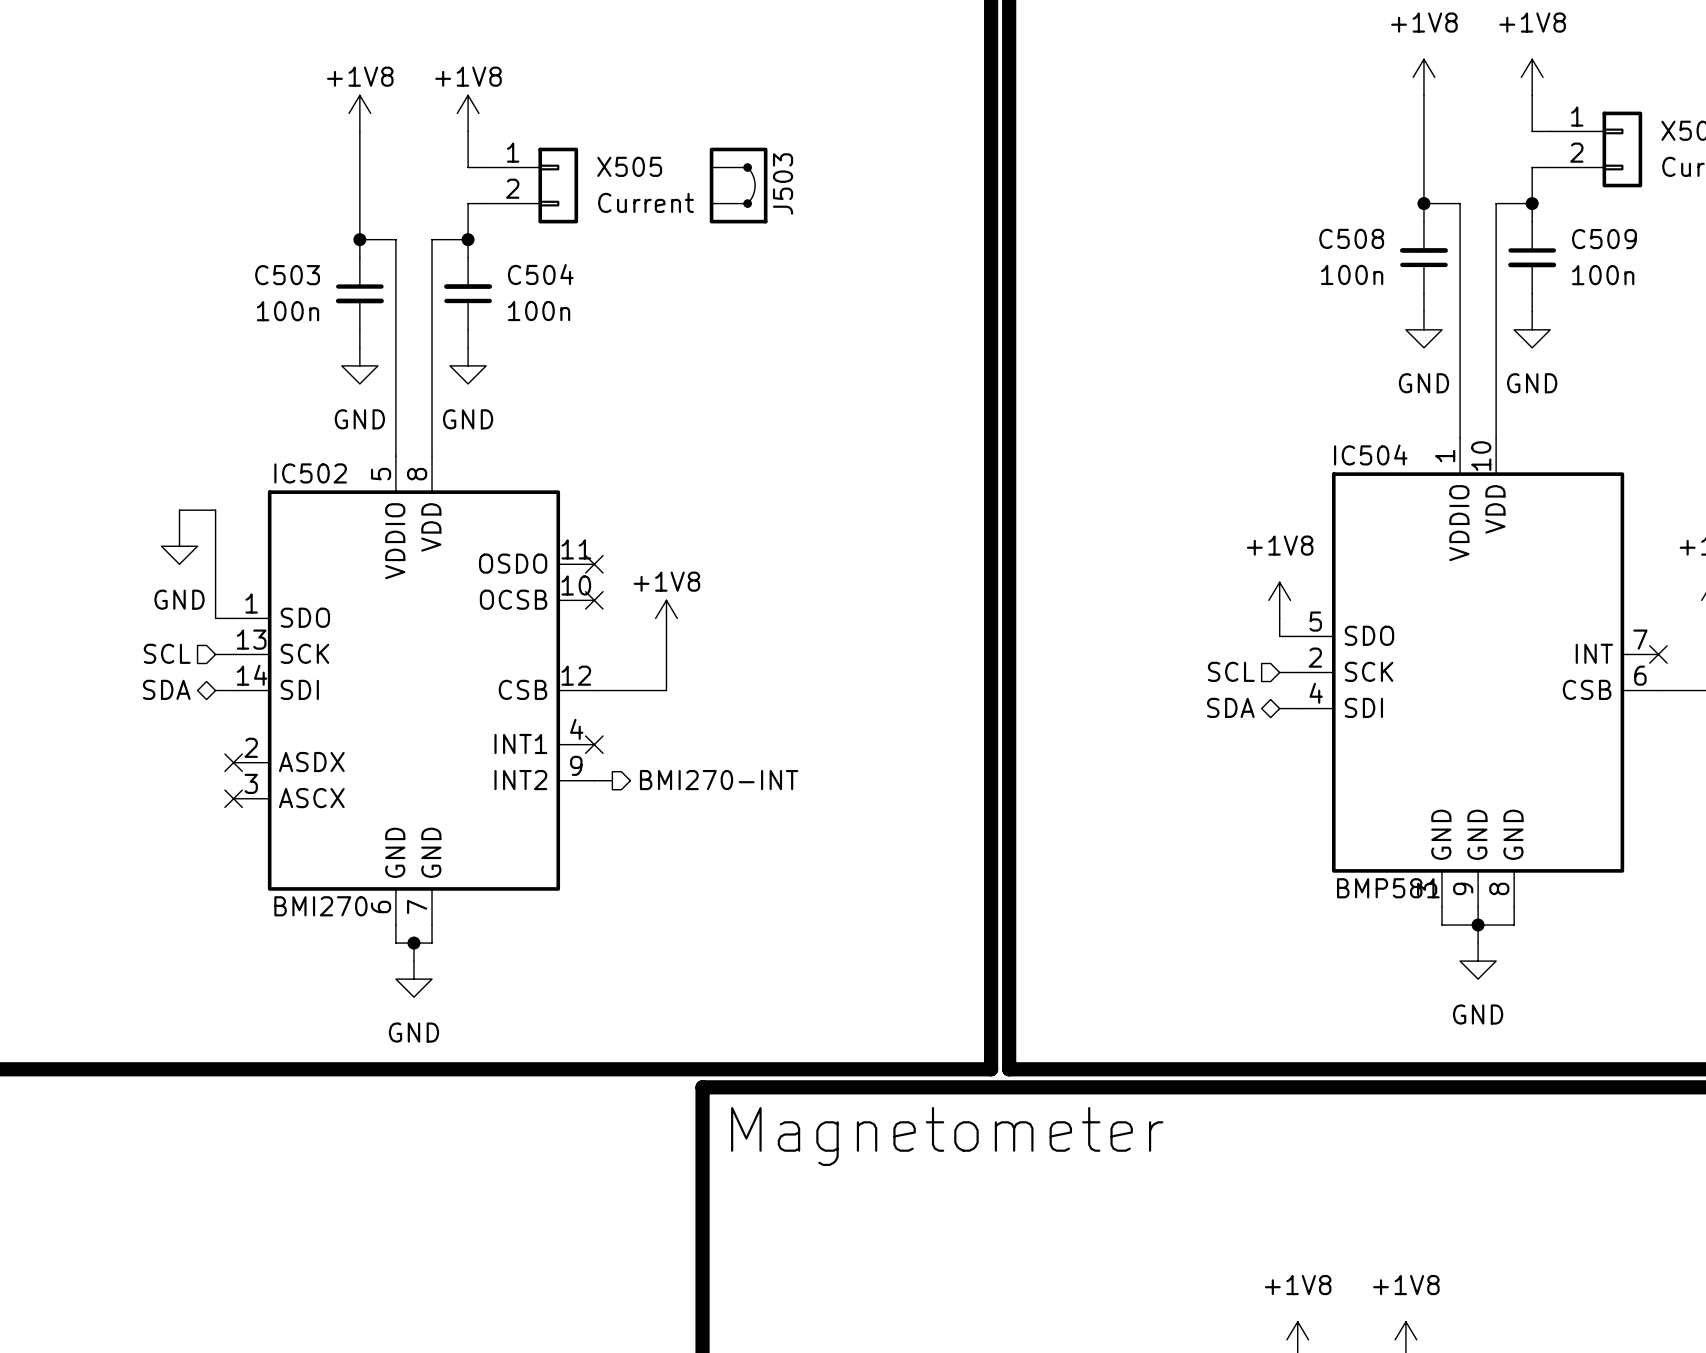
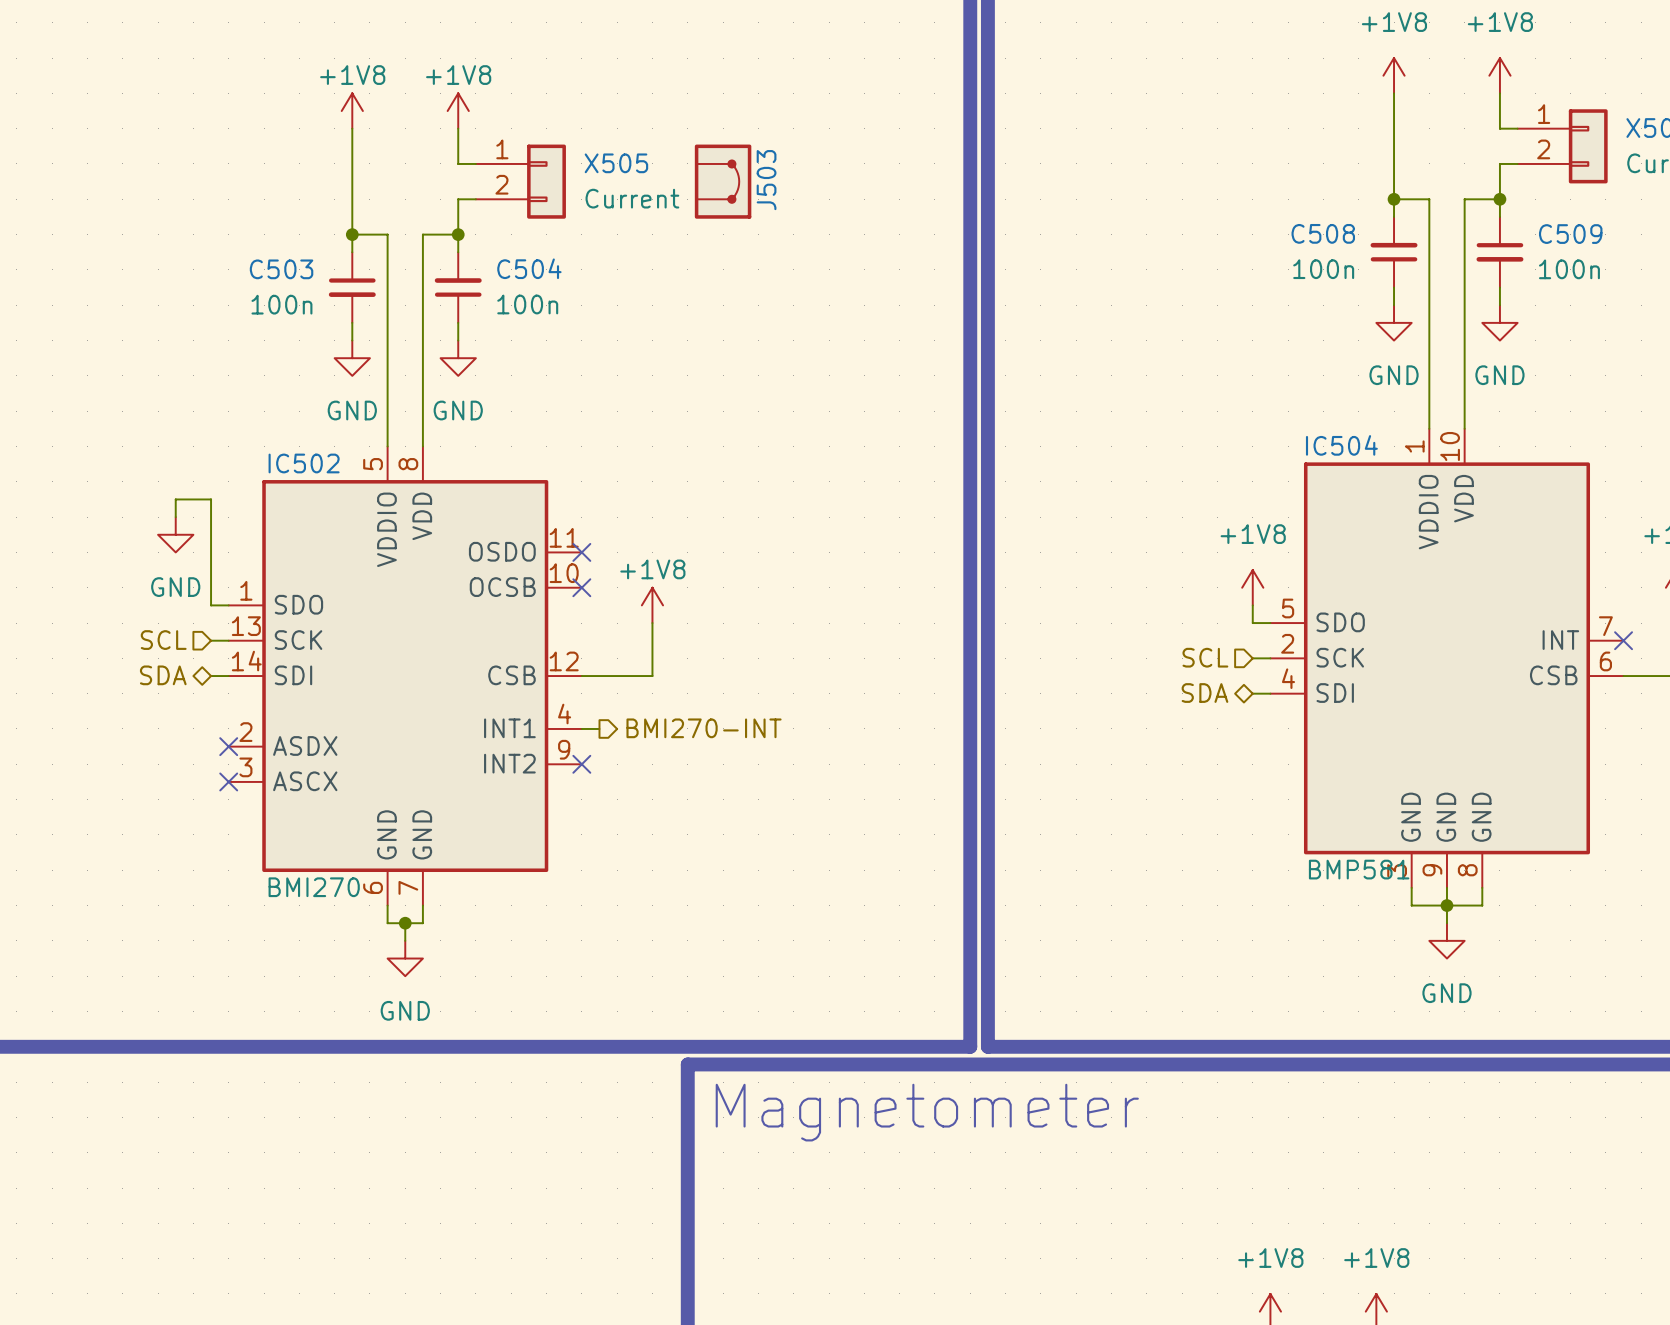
no-connect mark position: (594, 744) -> (581, 764)
wire: (594, 780) (612, 780) -> (581, 728) (599, 728)
hierarchical label position: BMI270-INT (719, 780) -> BMI270-INT (704, 728)

